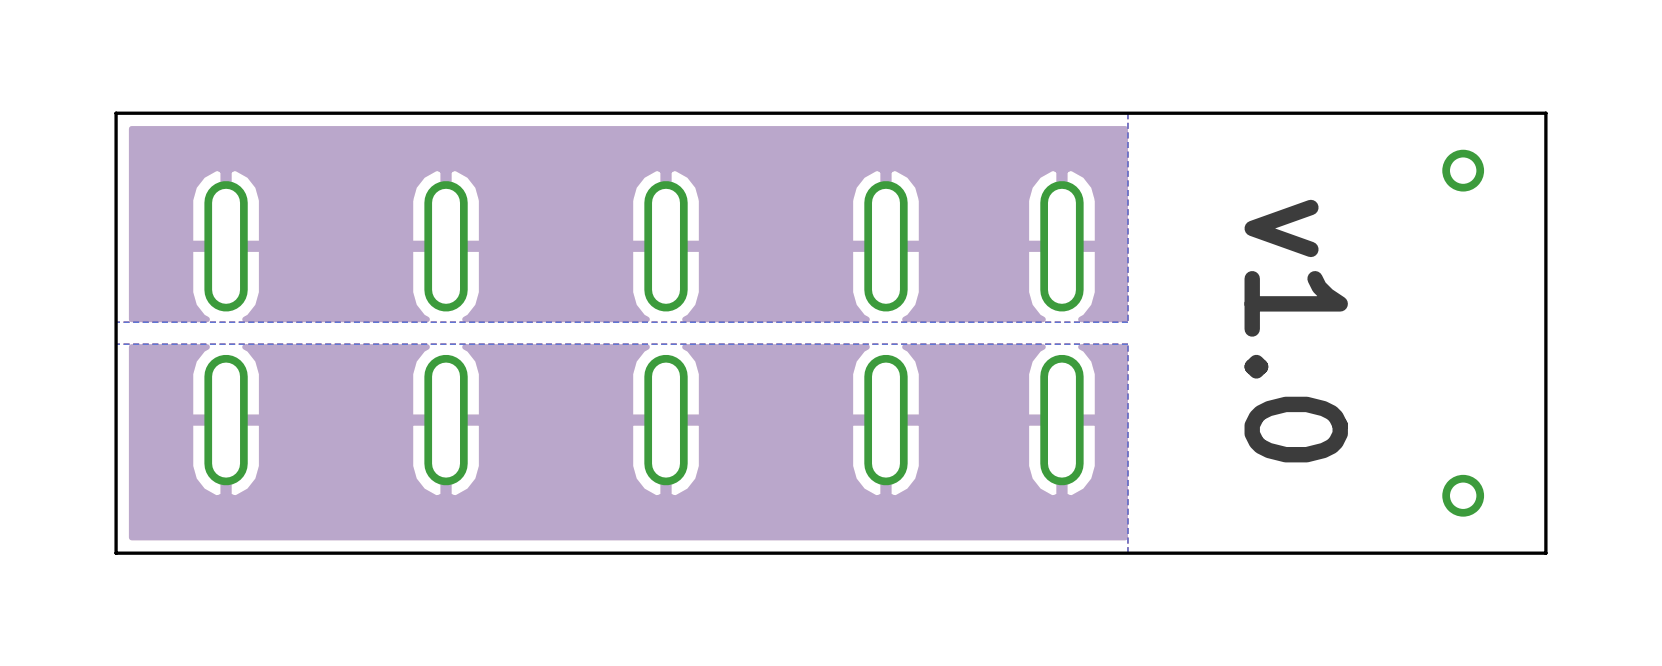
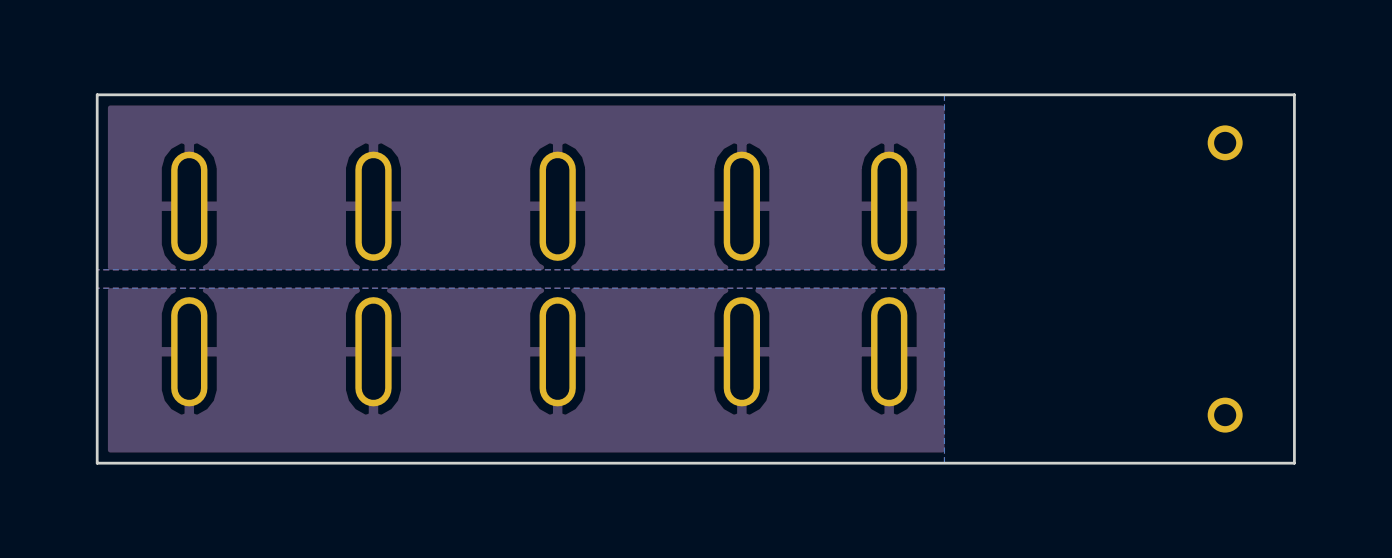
text: v1.0 (1296, 331) -> none

